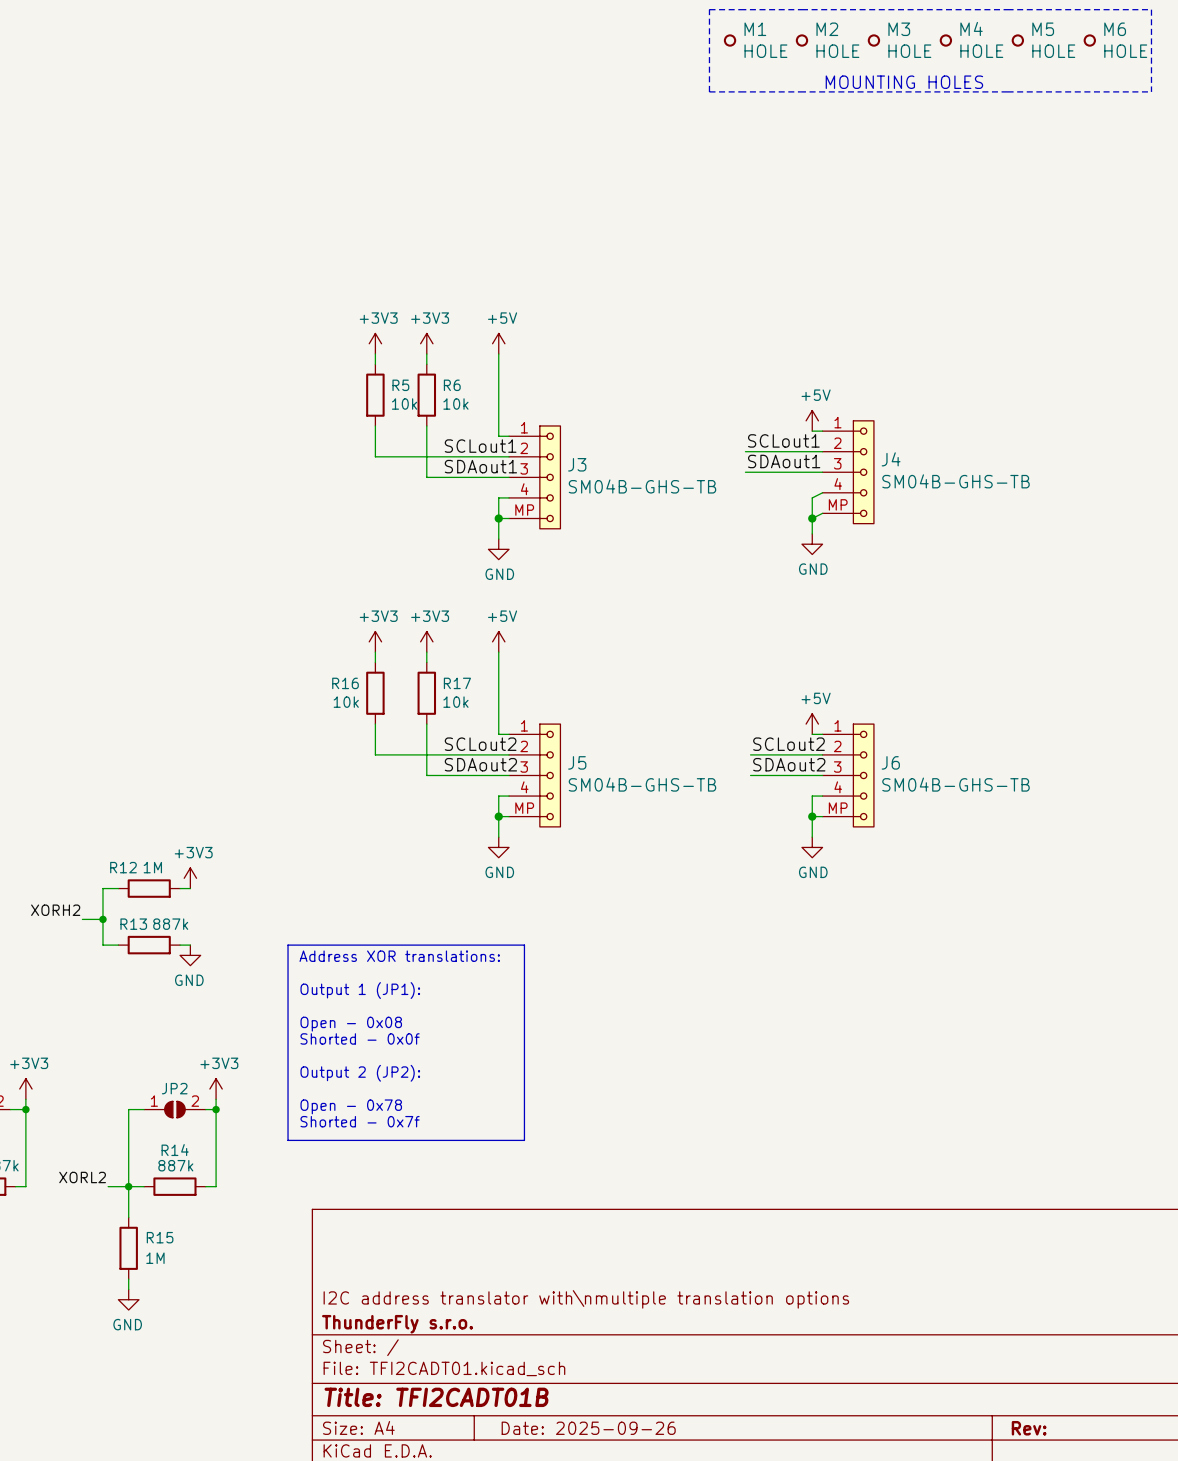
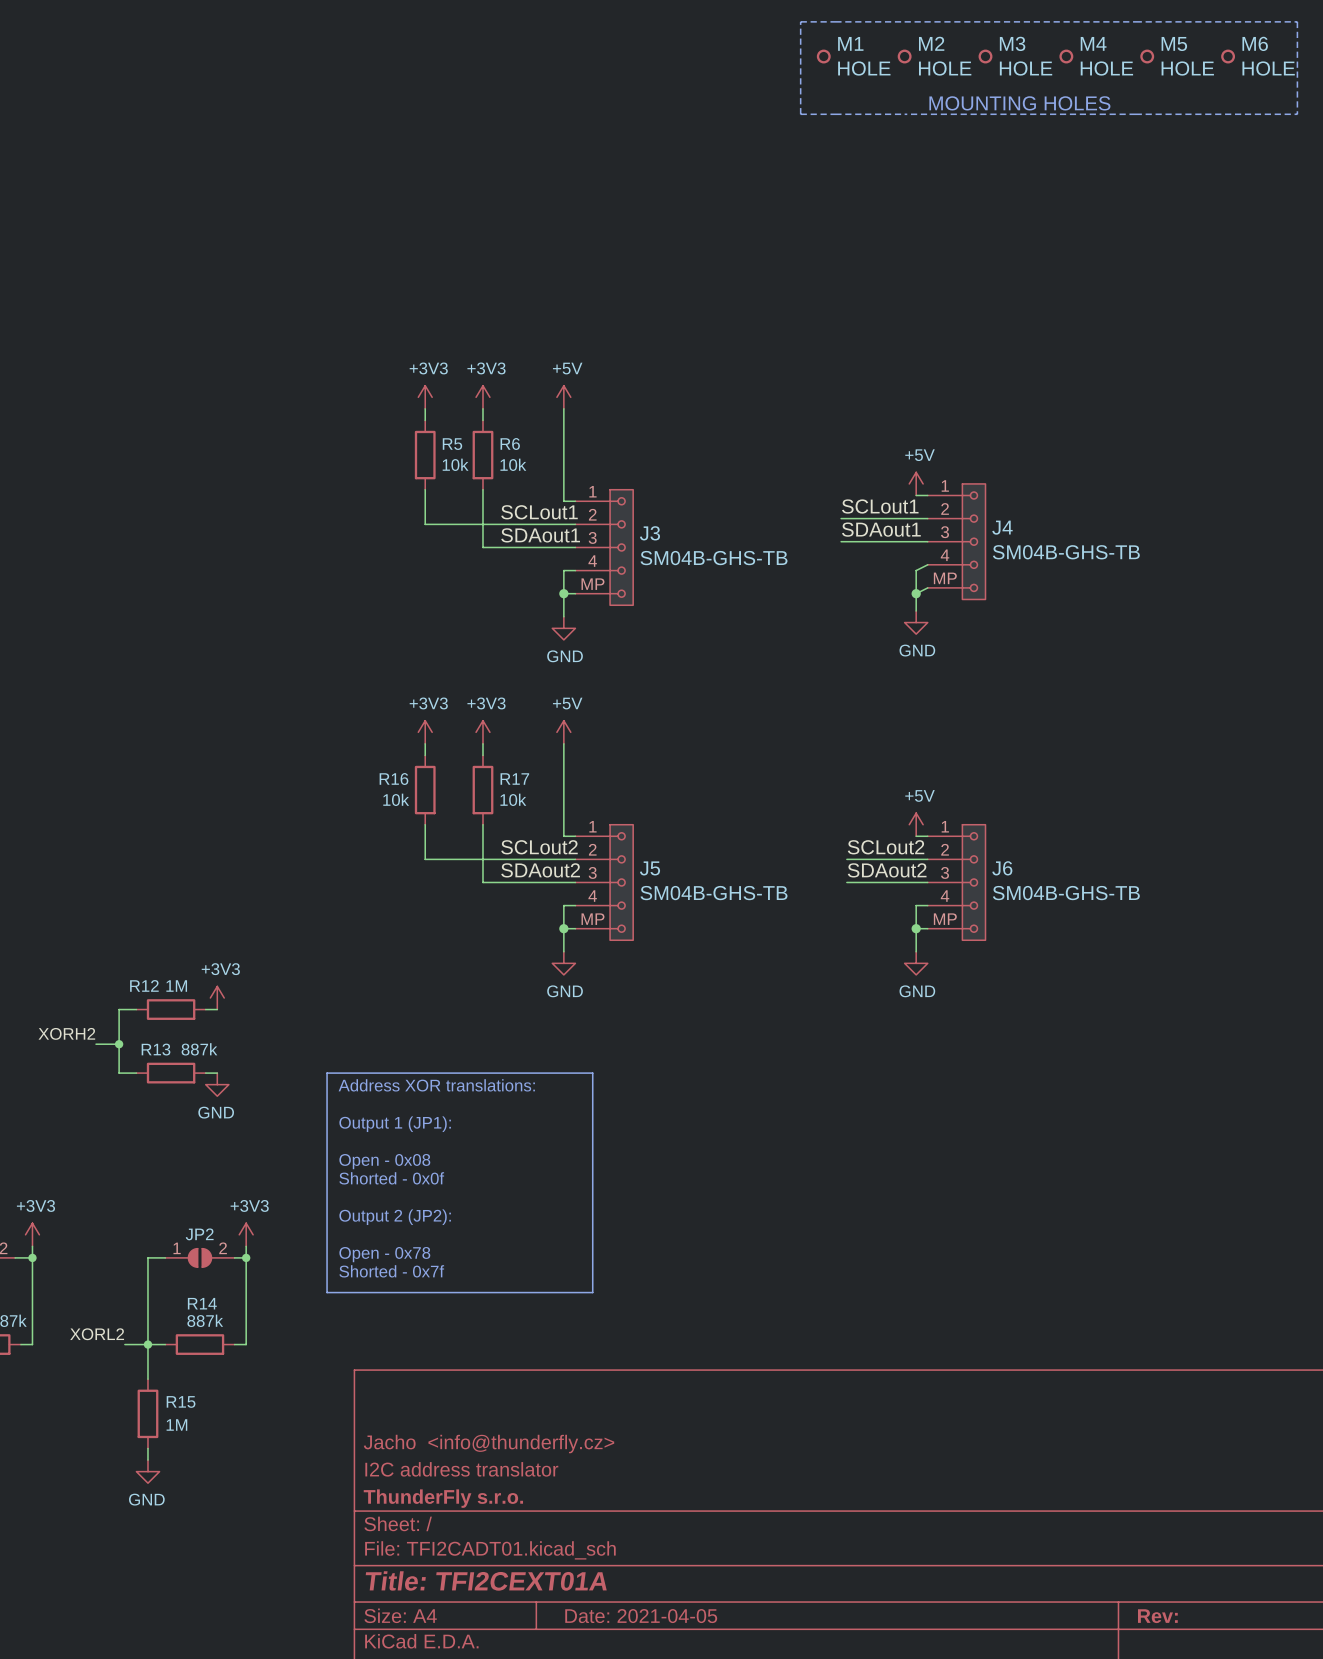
title block: none -> Jacho <info@thunderfly.cz> (489, 1444)
title block: I2C address translator with\nmultiple translation options (586, 1299) -> I2C address translator (461, 1469)
title block: Title: TFI2CADT01B (436, 1397) -> Title: TFI2CEXT01A (486, 1580)
title block: Date: 2025-09-26 (588, 1428) -> Date: 2021-04-05 (641, 1616)

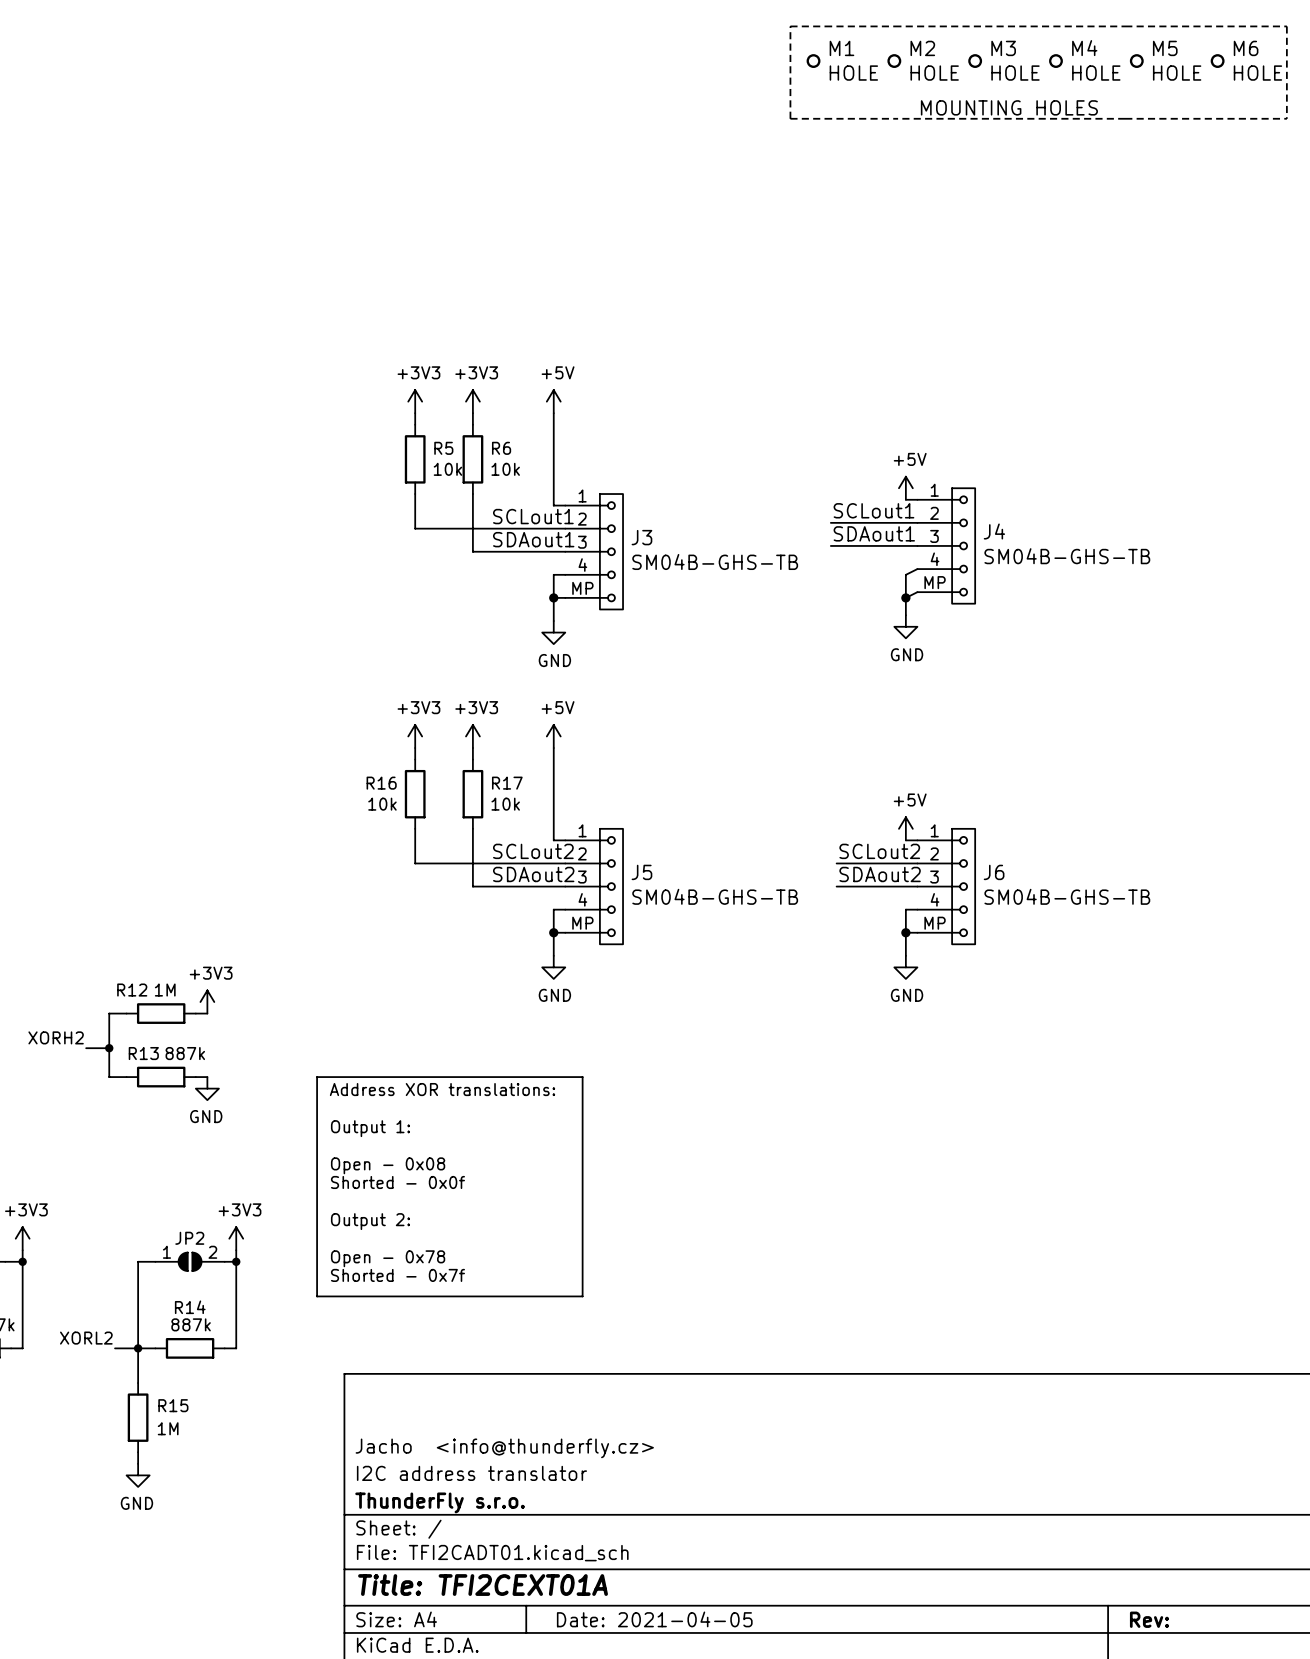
text: Output 1 (JP1): (395, 1124) -> Output 1: (370, 1128)
text: Output 2 (JP2): (395, 1217) -> Output 2: (370, 1221)

